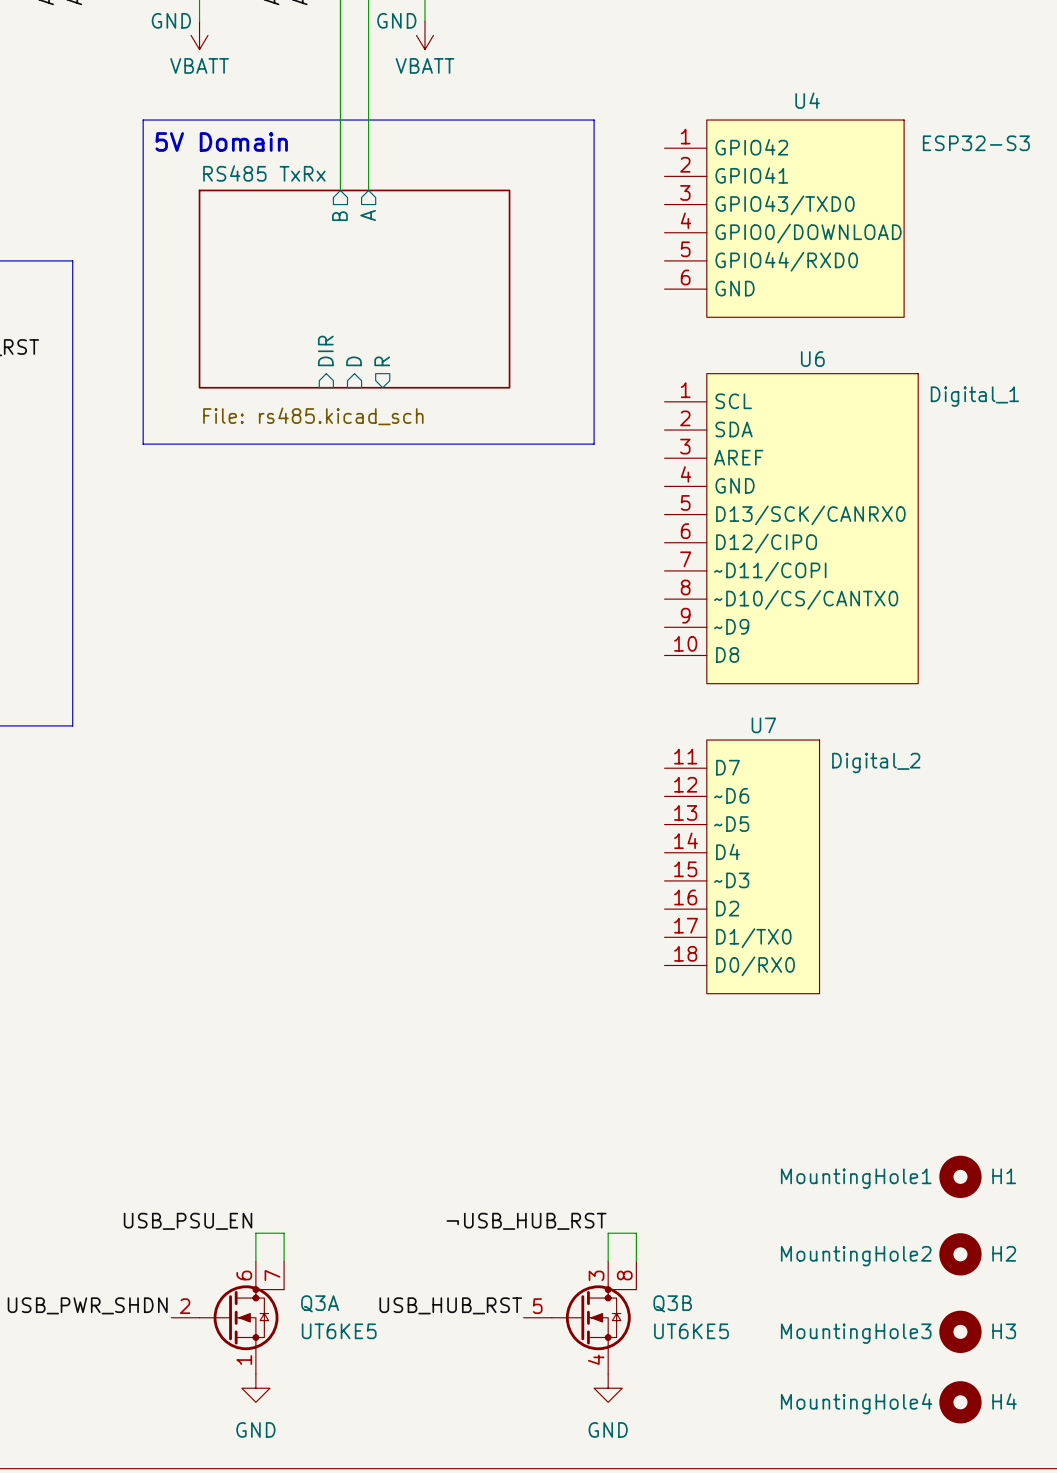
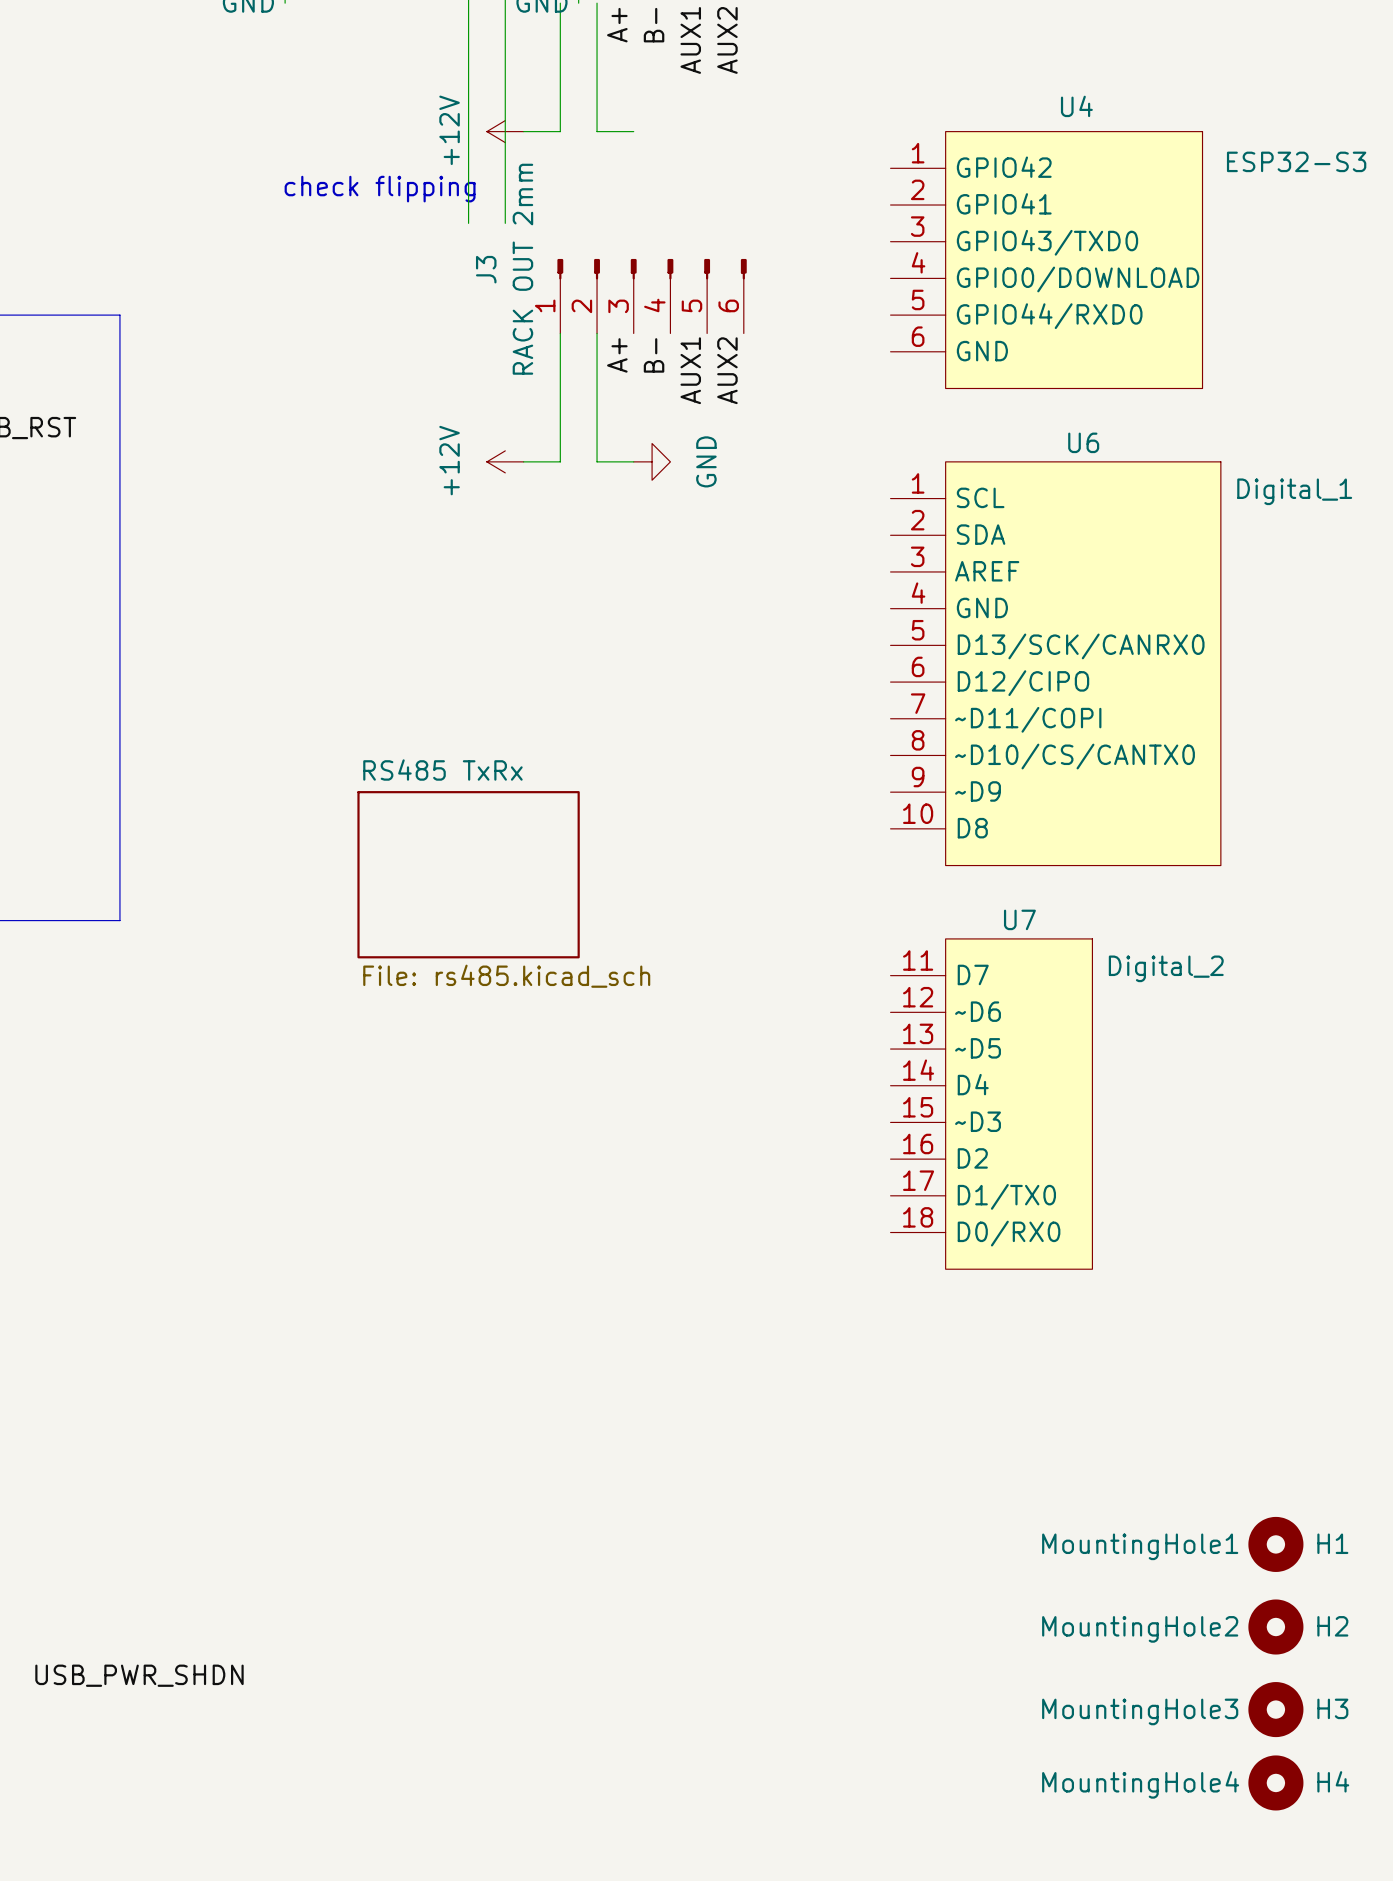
wire: none -> (560, 3) (560, 131) (523, 131)
wire: none -> (597, 3) (597, 131) (633, 131)
power symbol: VBATT (199, 35) -> none
power symbol: VBATT (424, 35) -> none
label: none -> A+ (617, 25)
label: none -> B- (654, 25)
label: none -> AUX1 (690, 40)
label: none -> AUX2 (727, 40)
line: (143, 120) (594, 120) (594, 444) (143, 444) (143, 120) -> none
power symbol: none -> +12V (505, 131)
text: 5V Domain (221, 141) -> none
text: none -> check flipping (380, 189)
sheet RS485 TxRx name position: RS485 TxRx (264, 173) -> RS485 TxRx (442, 770)
sheet RS485 TxRx shape: [198, 189, 511, 389] -> [357, 791, 580, 959]
sheet pin: A (368, 215) -> none
sheet pin: B (339, 216) -> none
J3: none -> RACK OUT 2mm (652, 296)
wire: none -> (560, 333) (560, 461) (523, 461)
wire: none -> (597, 333) (597, 461) (633, 461)
label: none -> A+ (617, 355)
label: none -> B- (654, 355)
label: none -> AUX1 (690, 370)
label: none -> AUX2 (727, 370)
sheet pin: DIR (325, 350) -> none
sheet pin: D (354, 361) -> none
sheet pin: R (382, 361) -> none
power symbol: none -> +12V (505, 461)
power symbol: none -> GND (652, 461)
sheet RS485 TxRx value position: File: rs485.kicad_sch (313, 416) -> File: rs485.kicad_sch (506, 976)
H1 position: (960, 1176) -> (1275, 1544)
label: USB_PSU_EN (188, 1221) -> none
label: ¬USB_HUB_RST (526, 1221) -> none
H2 position: (960, 1254) -> (1275, 1627)
wire: (255, 1261) (255, 1233) (284, 1233) (284, 1261) -> none
wire: (608, 1261) (608, 1233) (636, 1233) (636, 1261) -> none
label: USB_HUB_RST (450, 1305) -> none
Q3A: UT6KE5 (227, 1317) -> none
Q3B: UT6KE5 (579, 1317) -> none
power symbol: GND (255, 1388) -> none
power symbol: GND (608, 1388) -> none
H4 position: (960, 1402) -> (1275, 1782)

